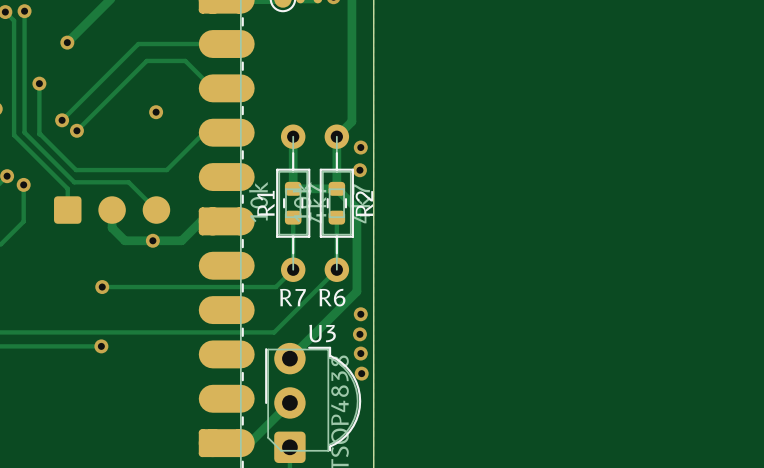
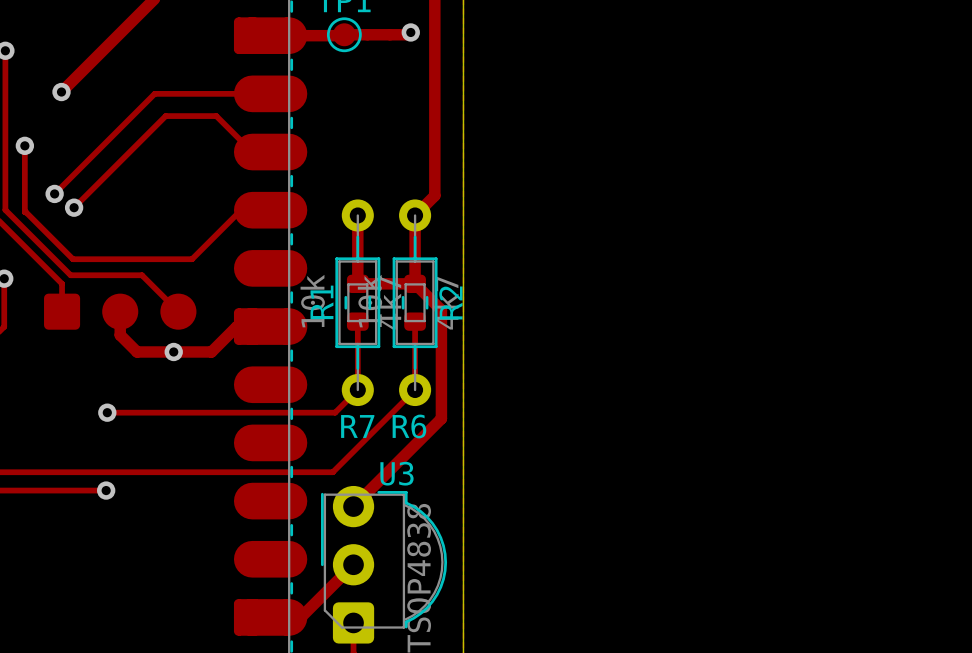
via: (156, 112) -> none
via: (360, 147) -> none
via: (359, 170) -> none
via: (360, 314) -> none
via: (359, 334) -> none
via: (360, 353) -> none
via: (361, 373) -> none

